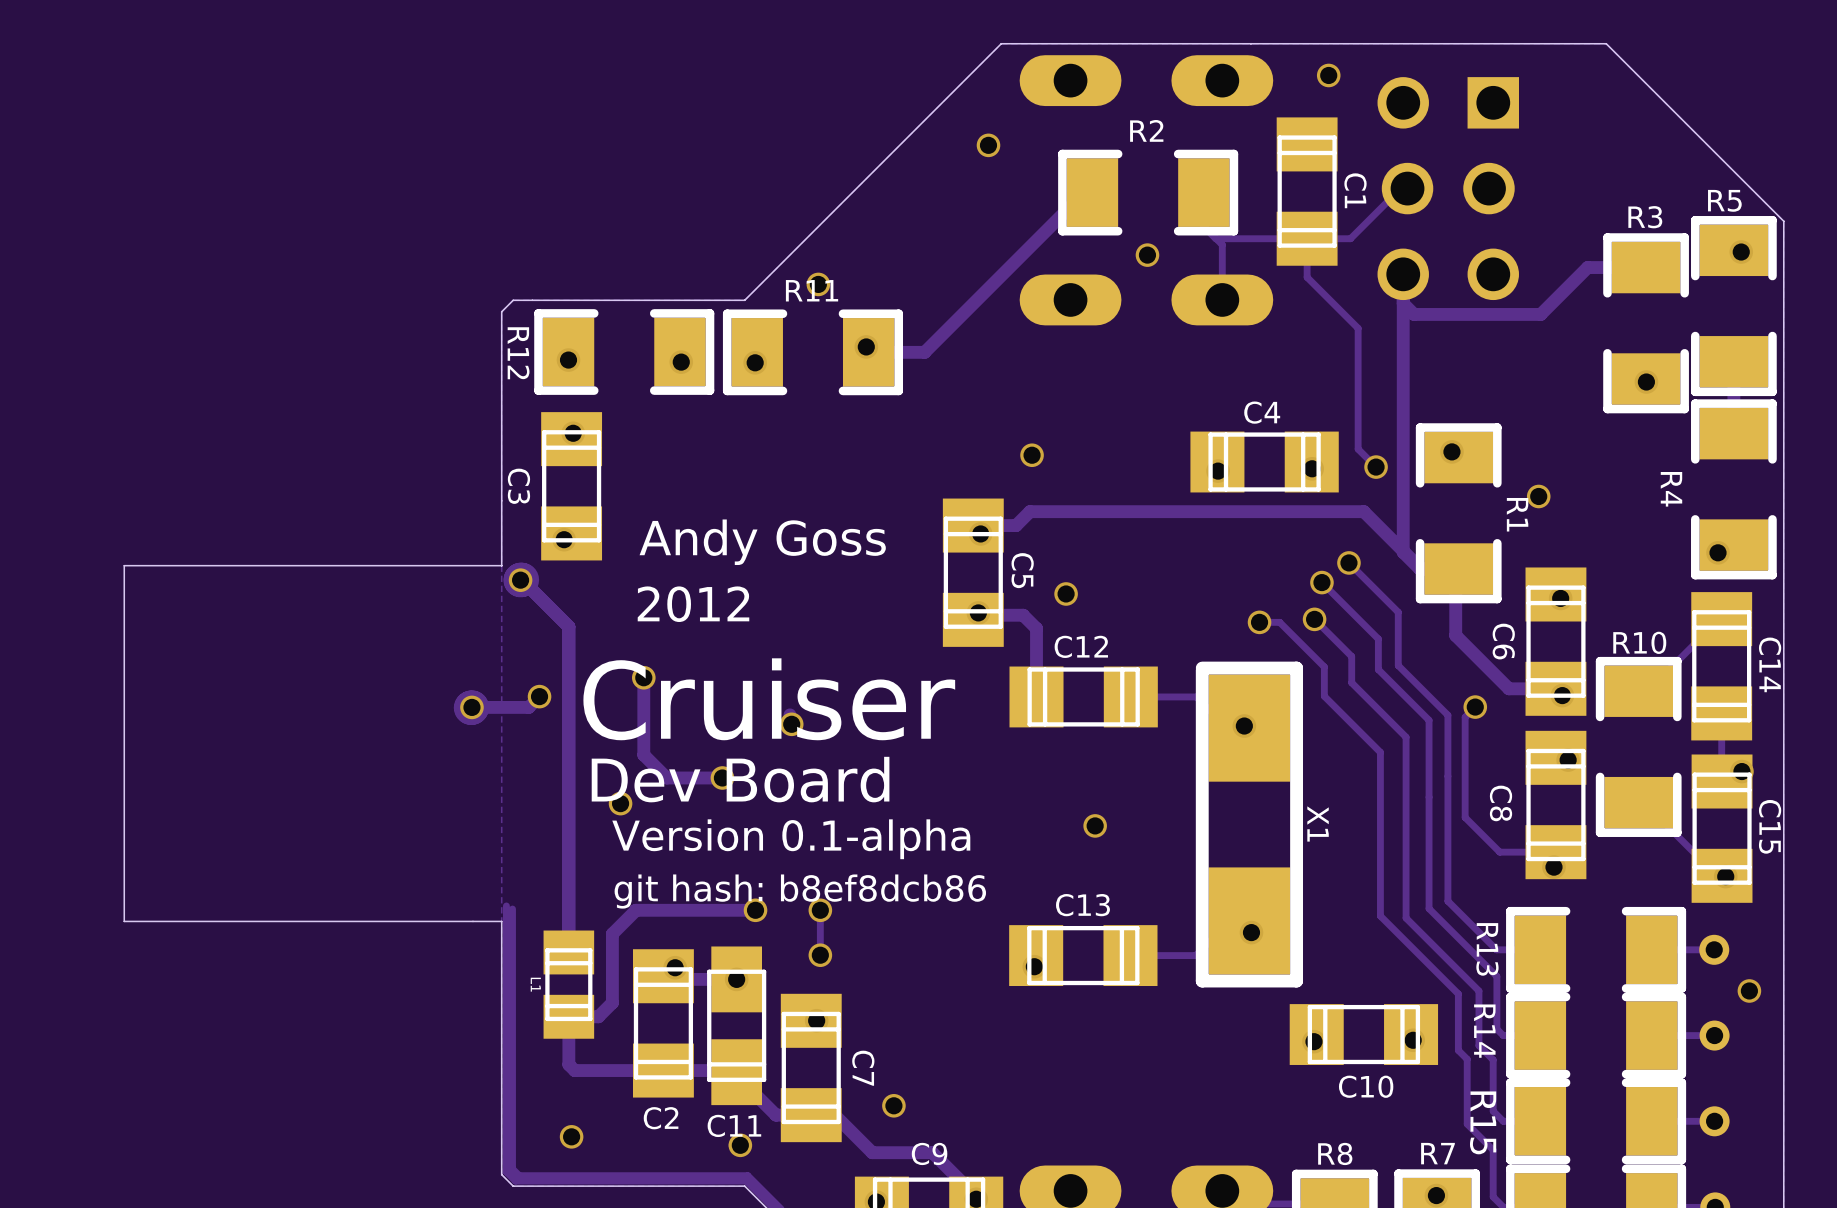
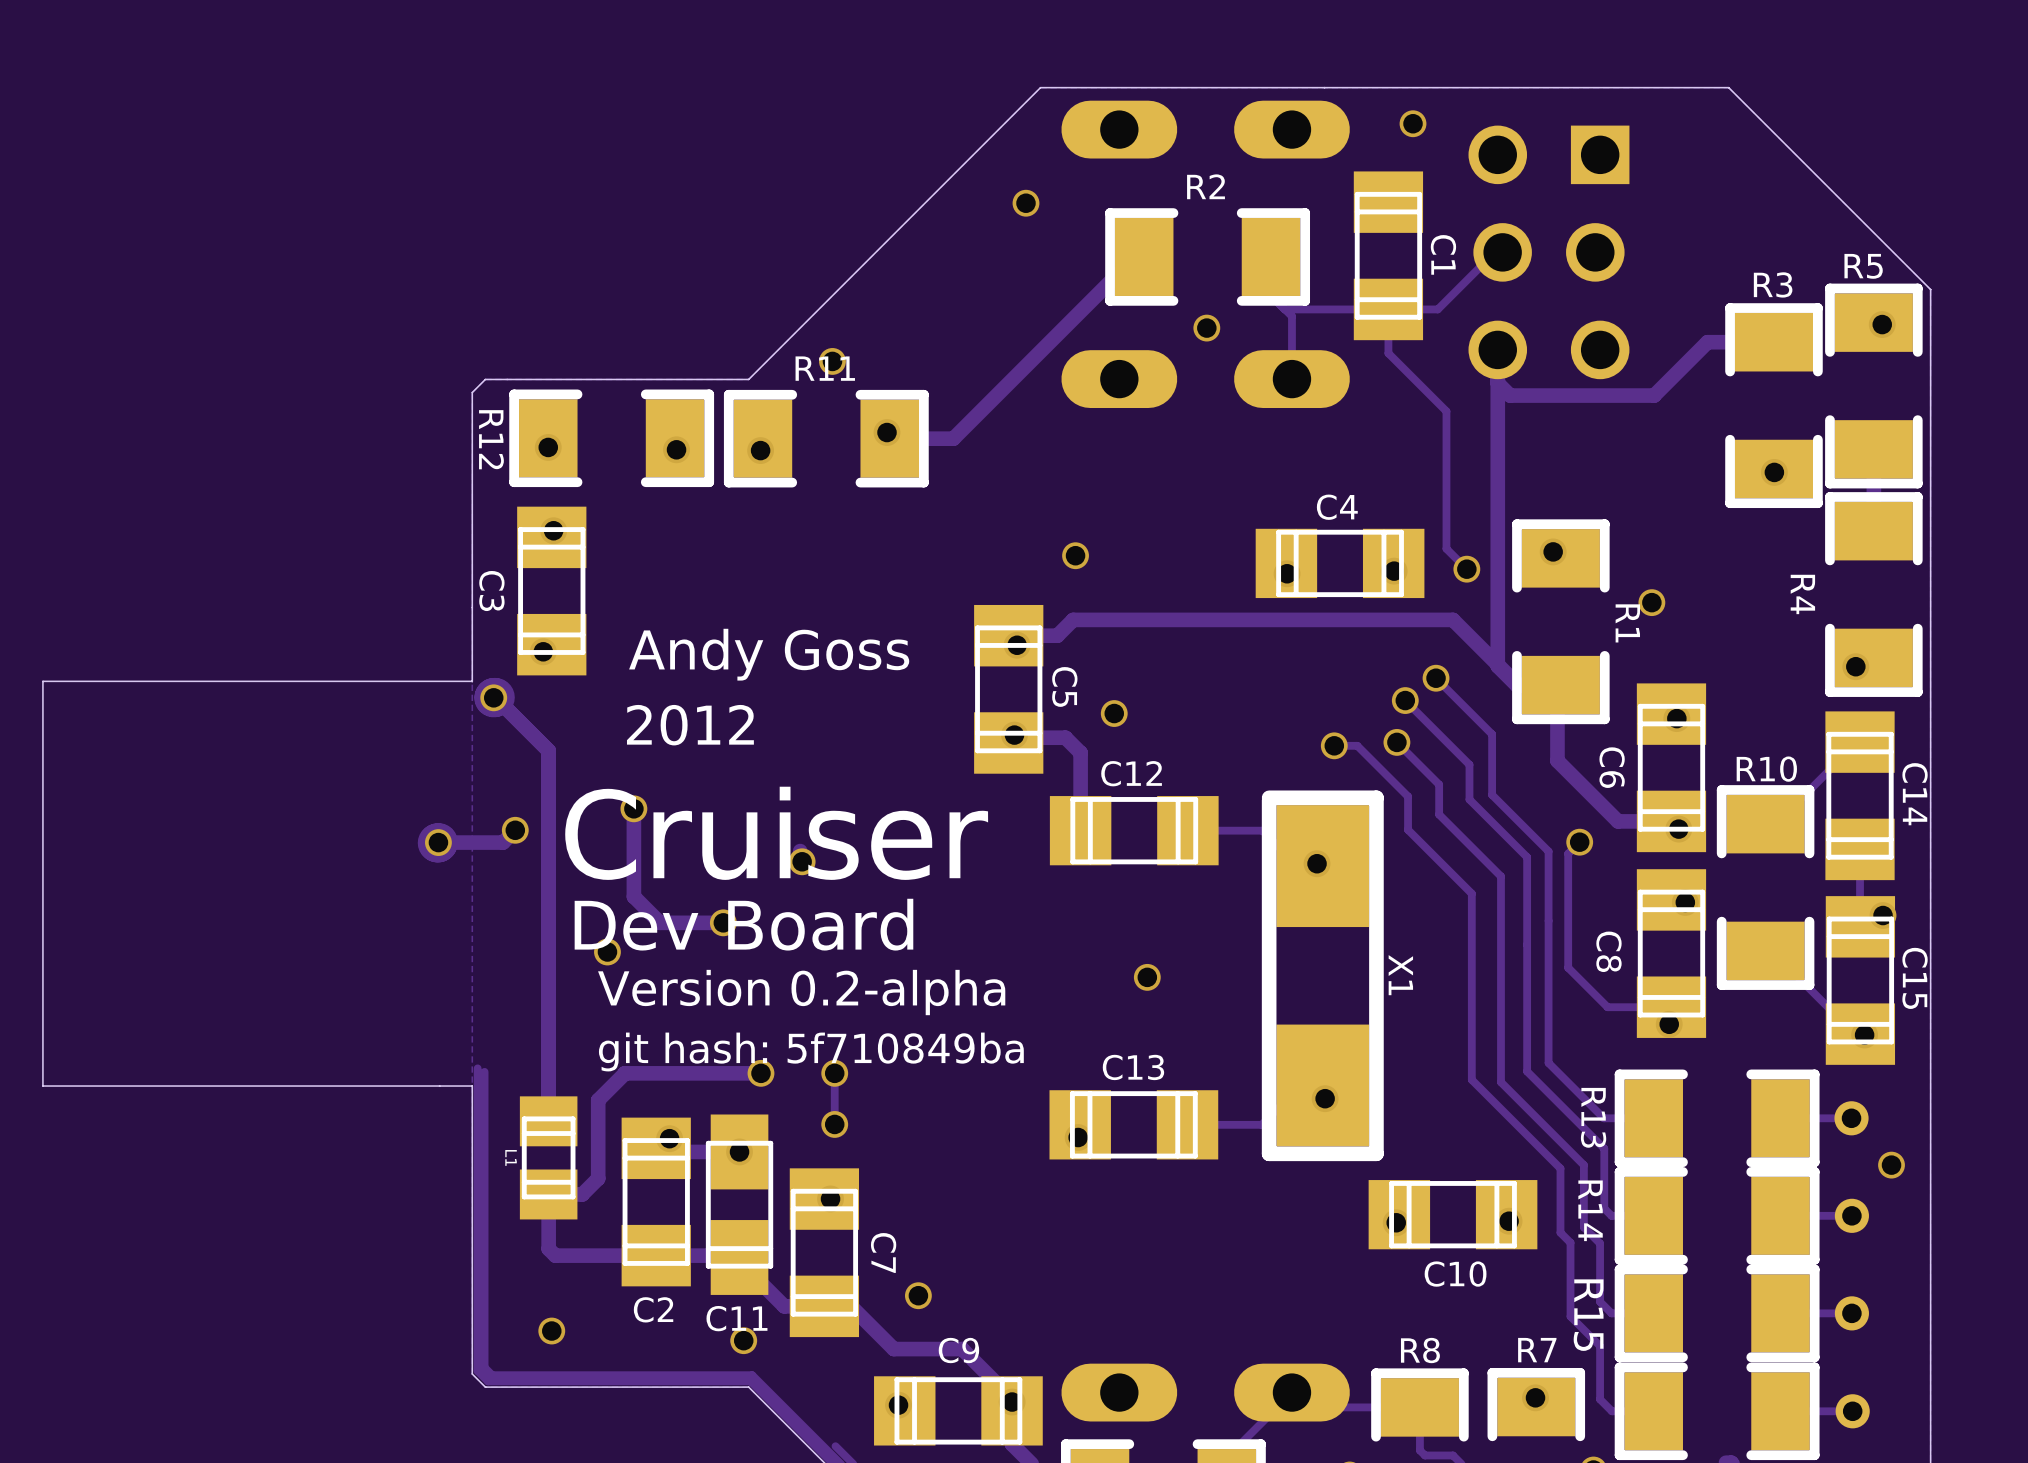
text: Version 0.1-alpha (791, 839) -> Version 0.2-alpha (801, 992)
text: git hash: b8ef8dcb86 (800, 891) -> git hash: 5f710849ba (811, 1052)

